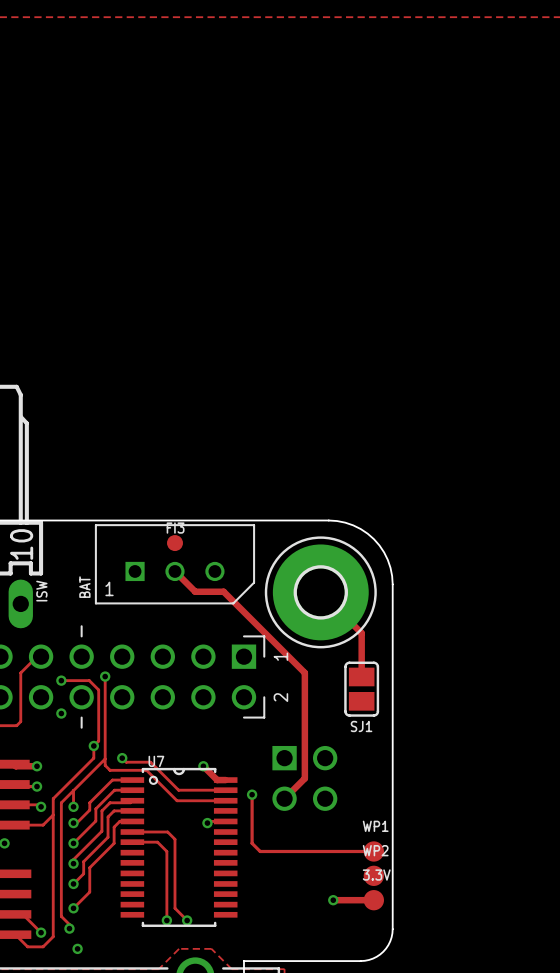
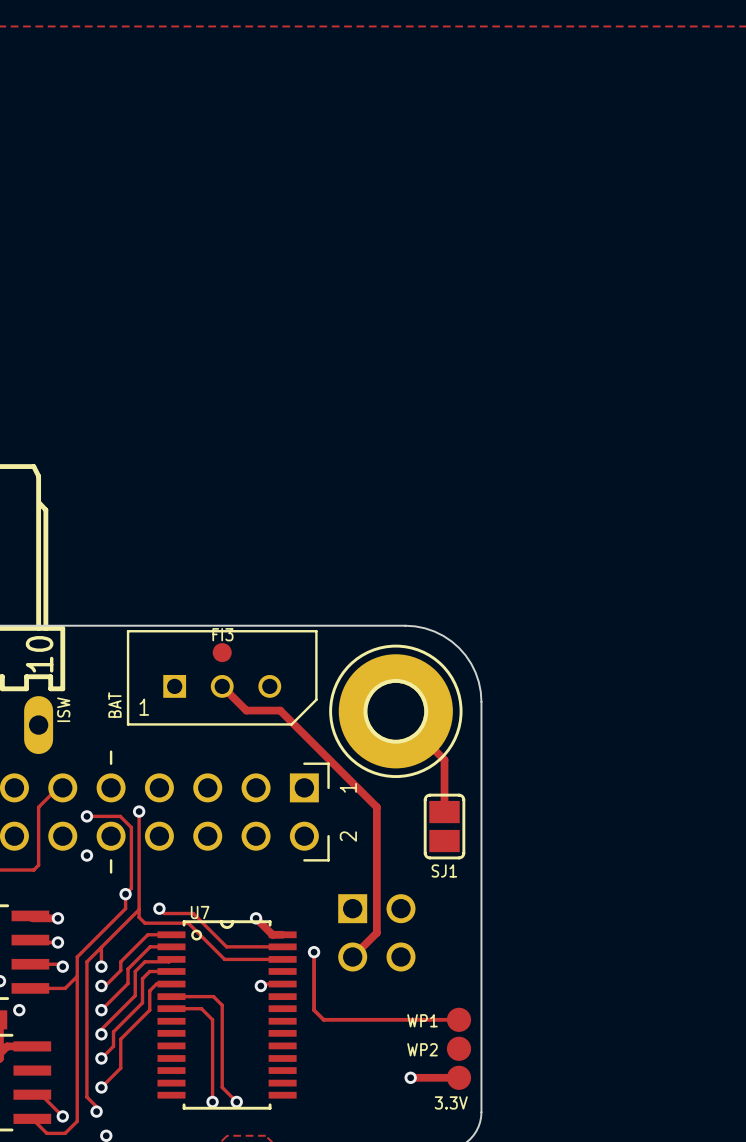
WP1 name position: WP1 (375, 826) -> WP1 (422, 1020)
WP2 name position: WP2 (375, 850) -> WP2 (422, 1049)
3.3V name position: 3.3V (376, 875) -> 3.3V (451, 1102)

